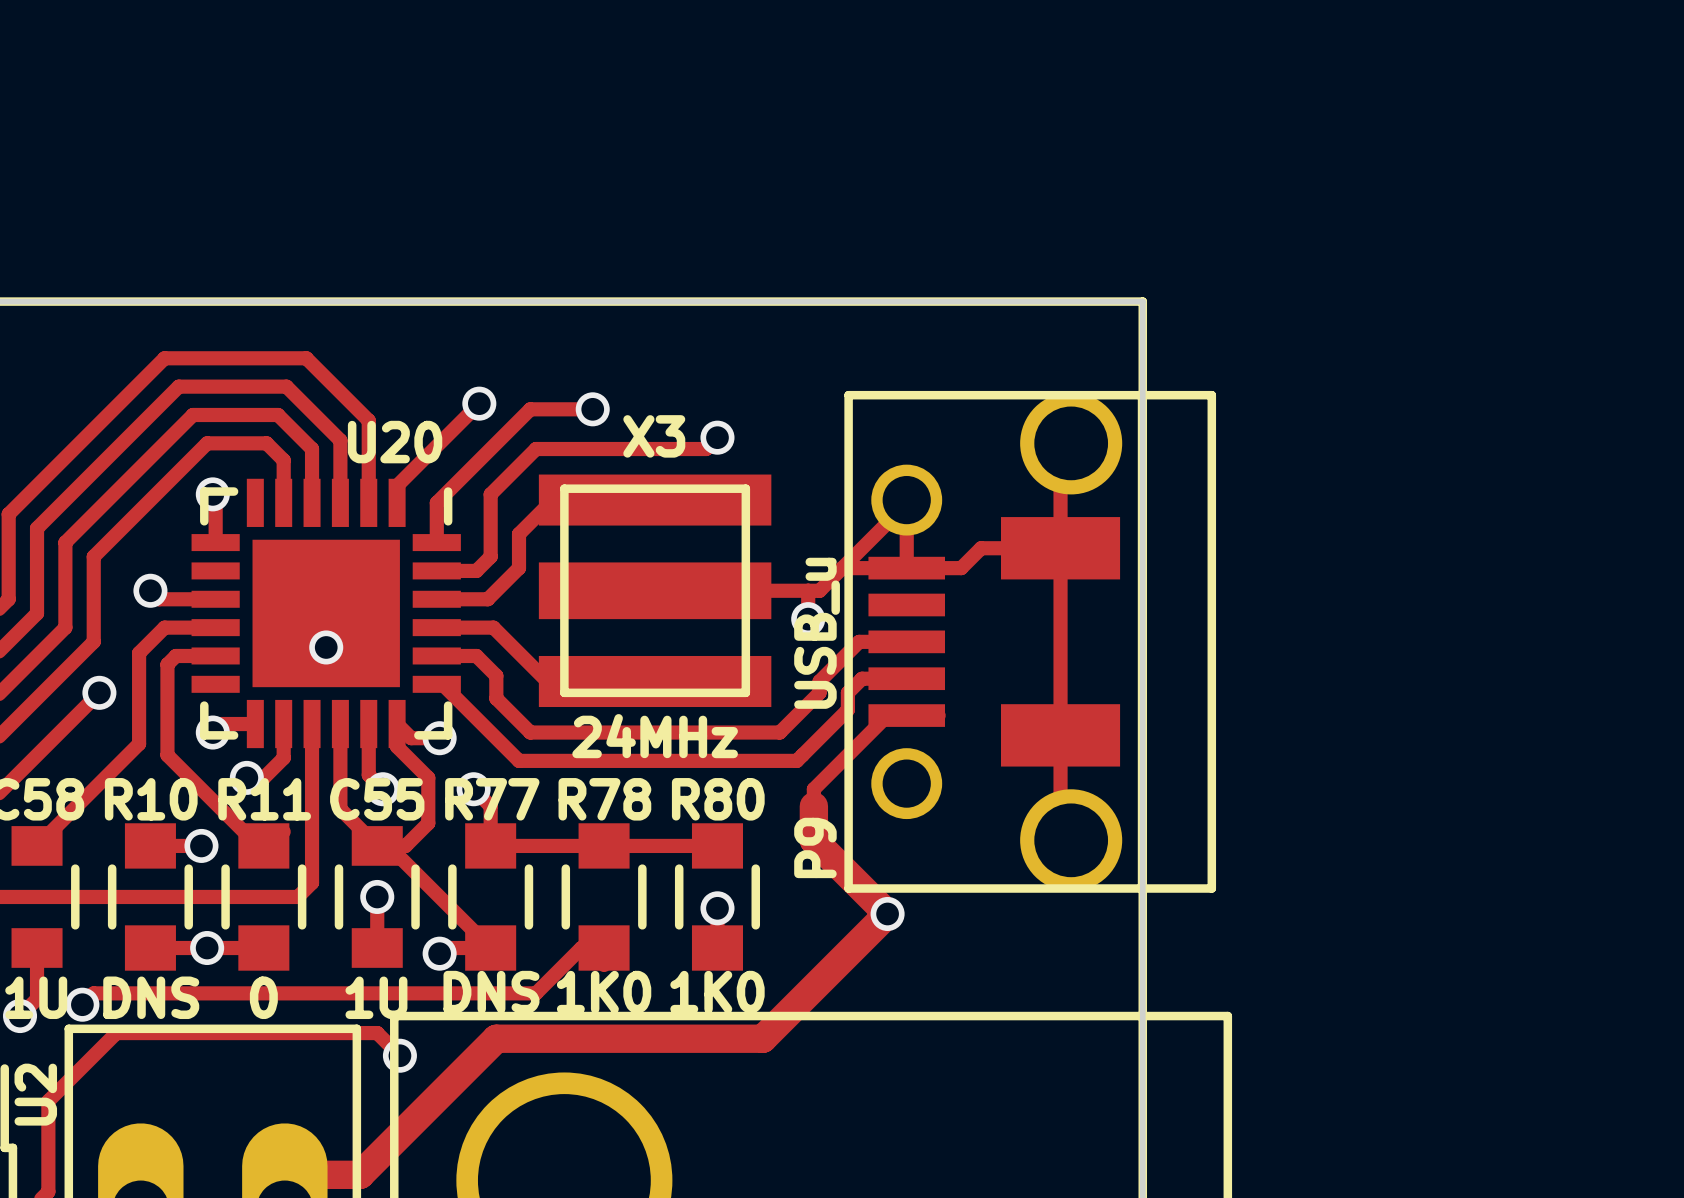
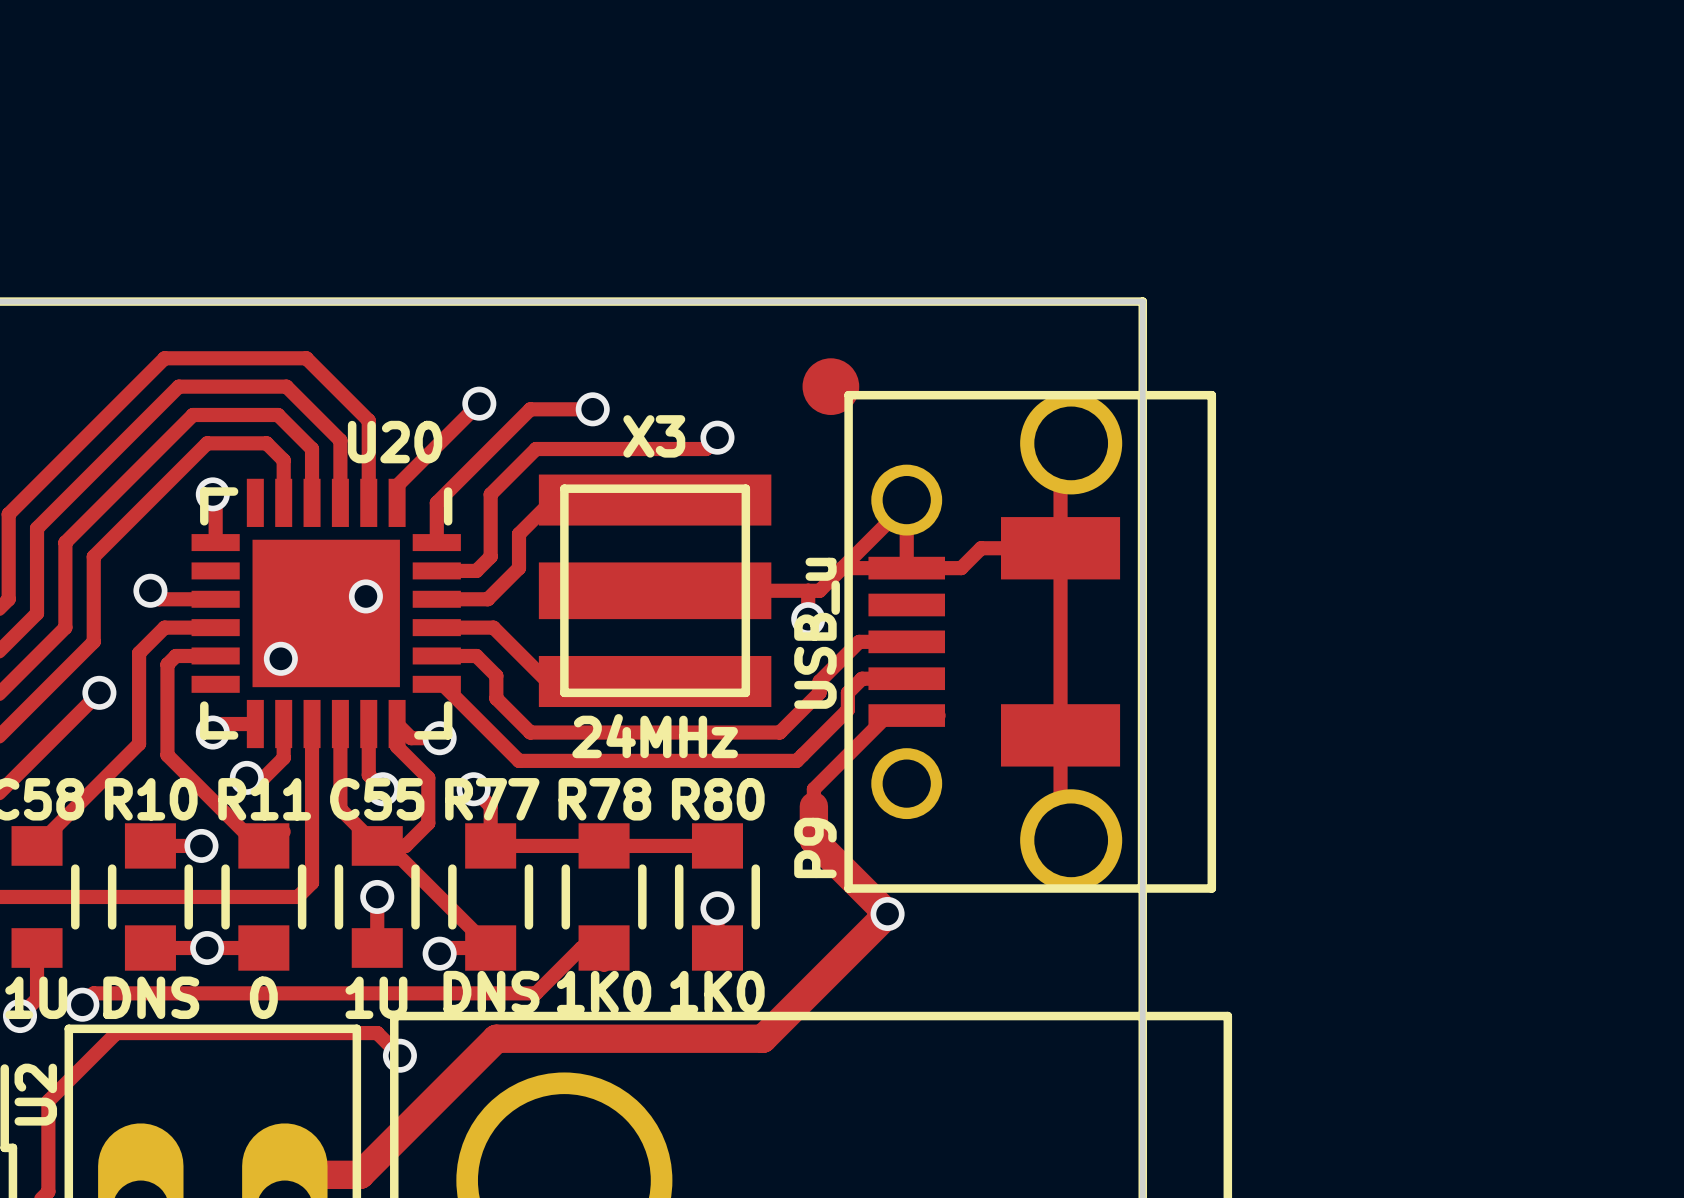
part: none -> (830, 386)
via: none -> (365, 596)
via: (326, 647) -> none
via: none -> (280, 658)

